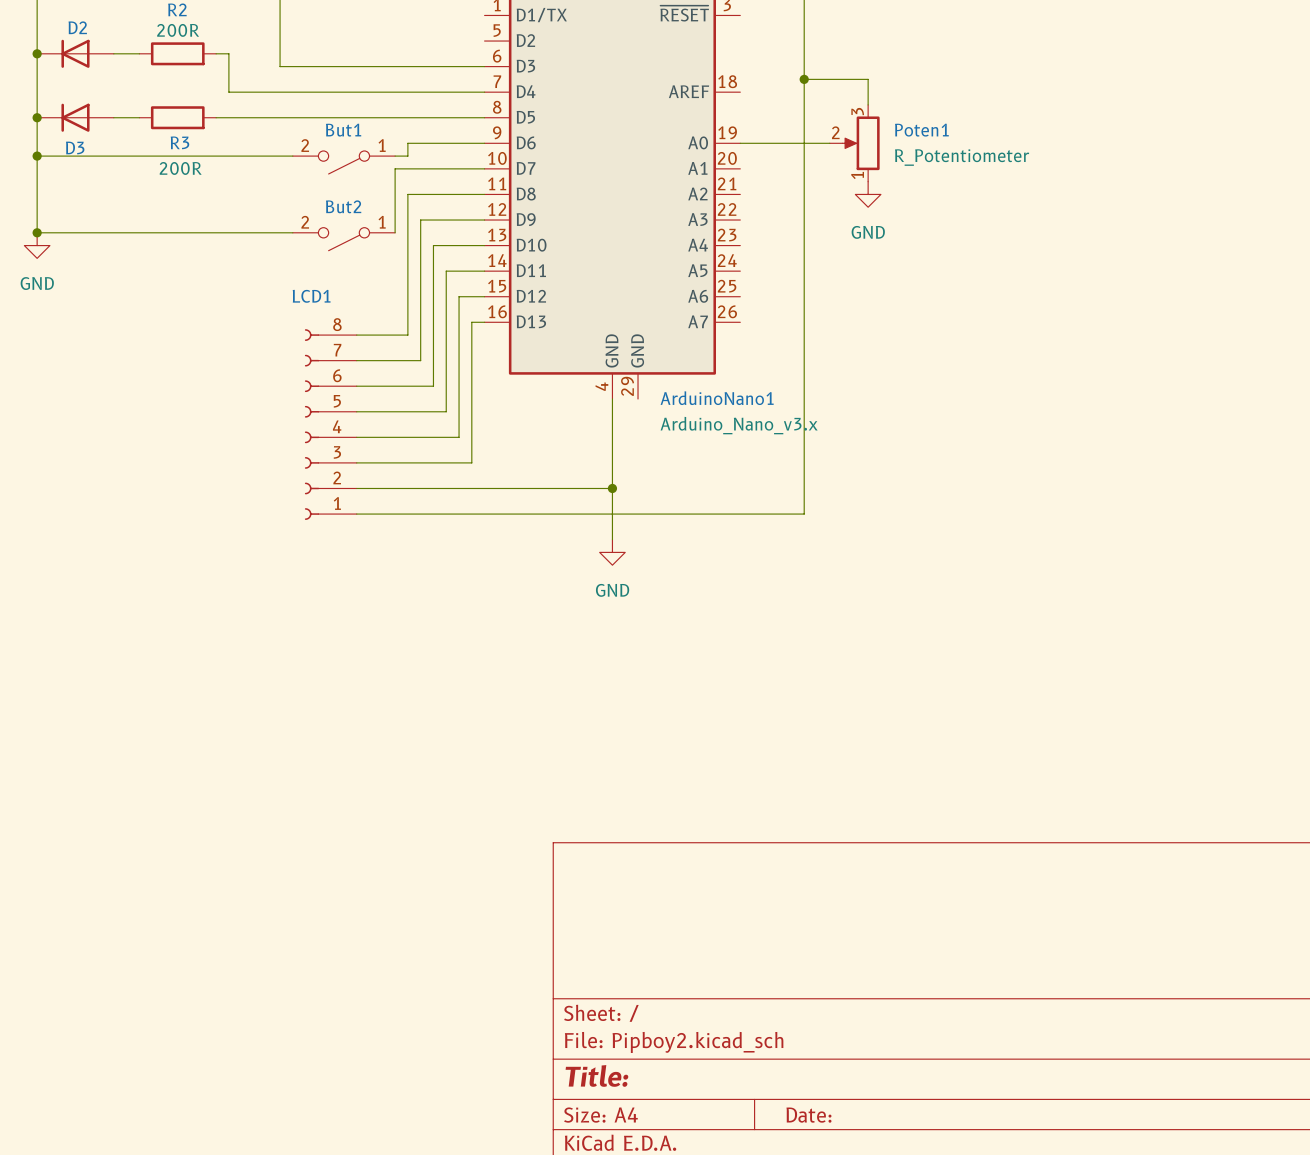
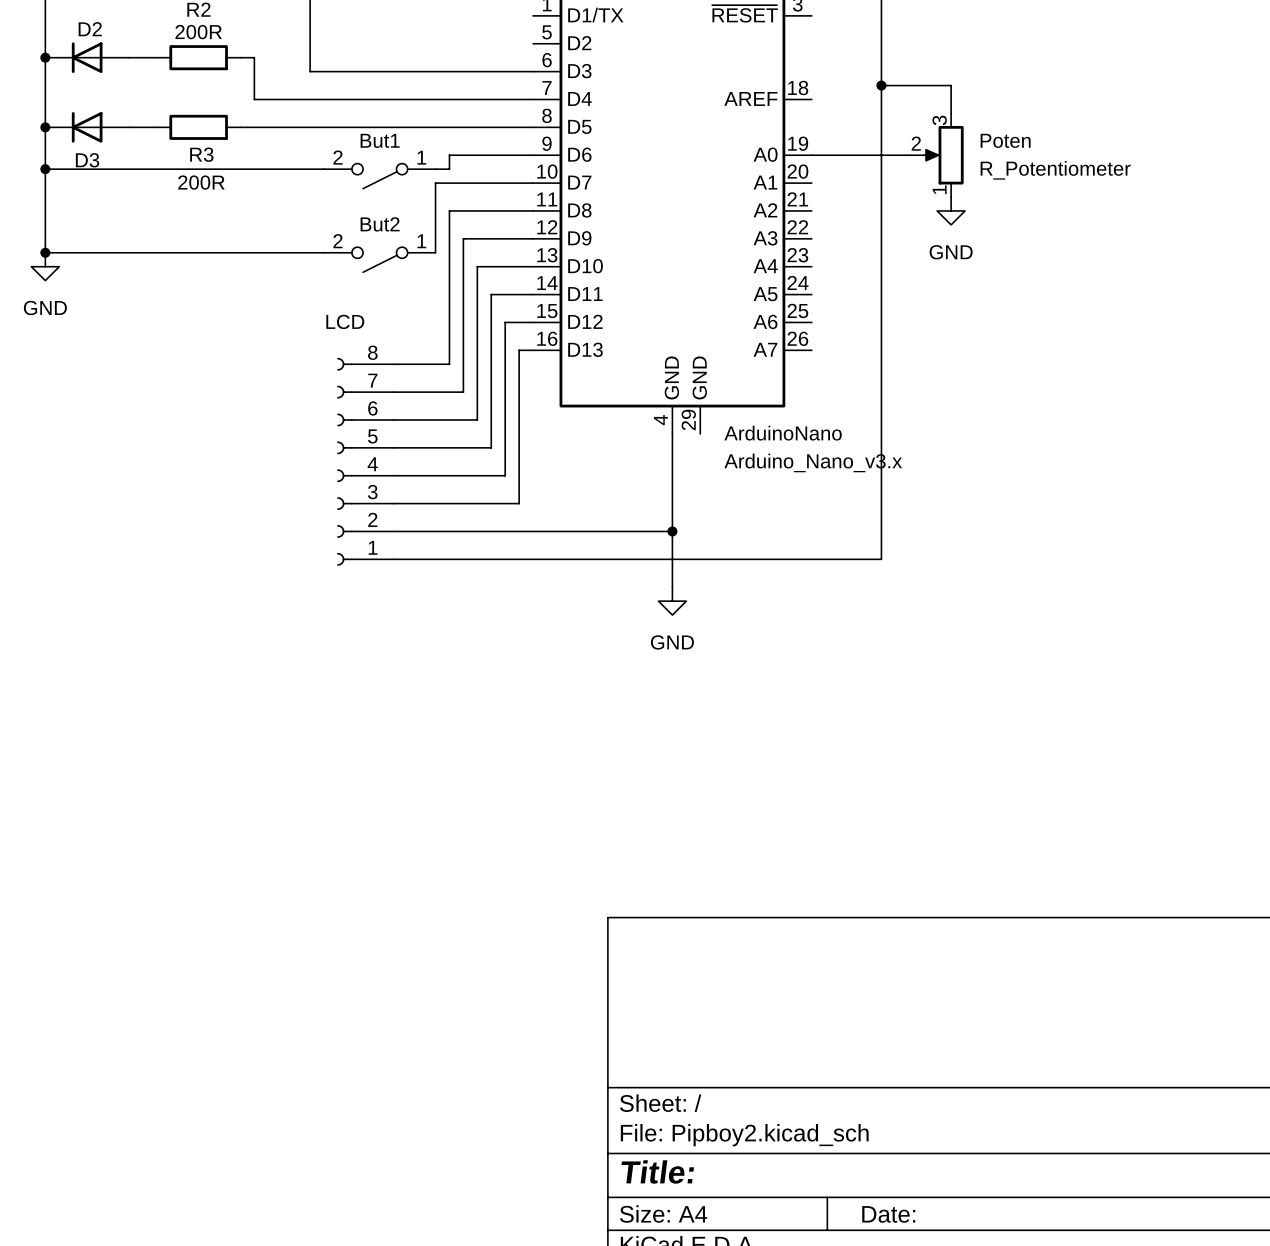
Poten1 name: Poten1 (921, 130) -> Poten (1005, 140)
LCD1 name: LCD1 (311, 296) -> LCD (345, 321)
ArduinoNano1 name: ArduinoNano1 (717, 398) -> ArduinoNano (783, 433)

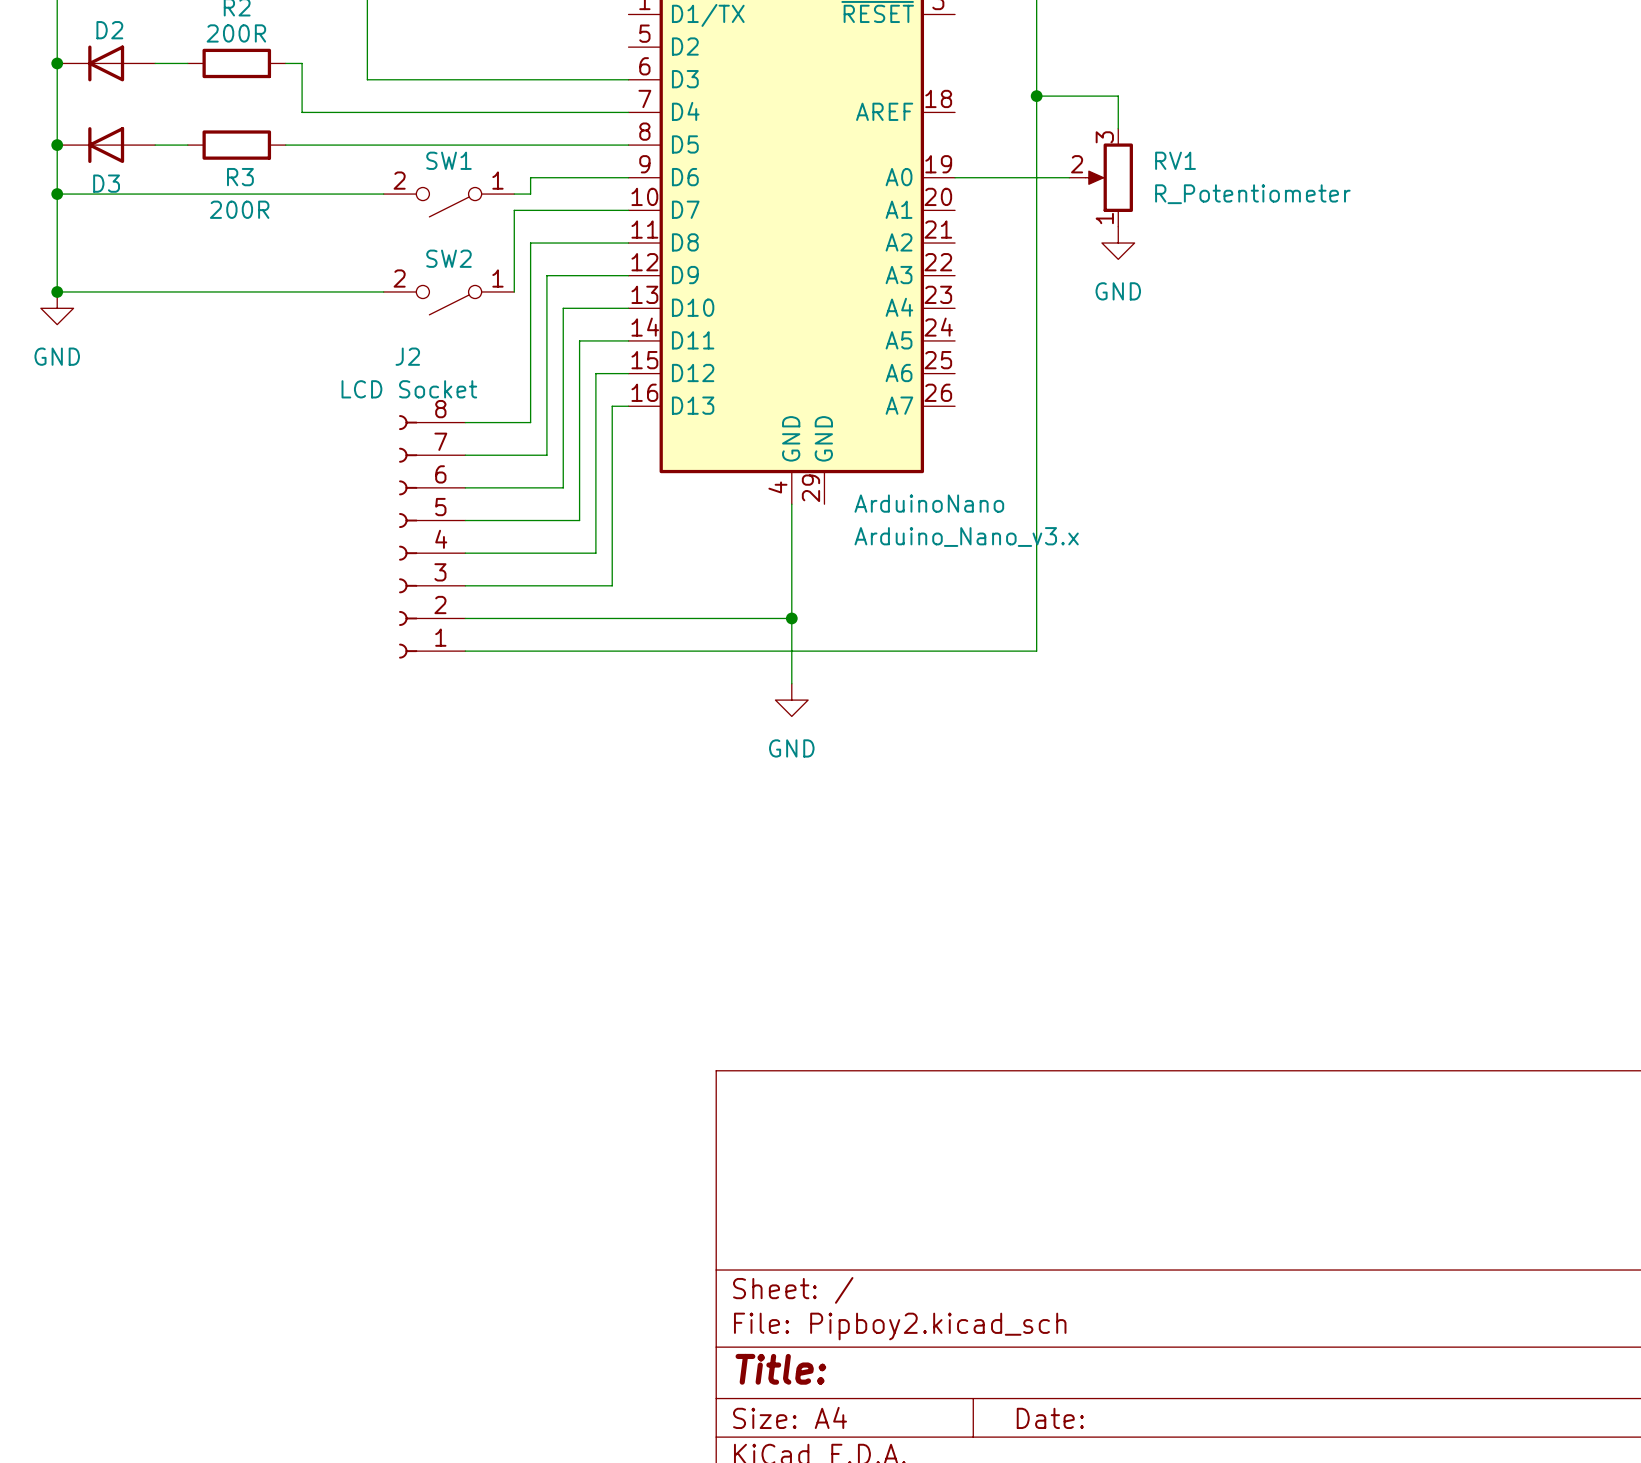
But1 name: But1 (380, 140) -> SW1 (448, 160)
Poten name: Poten (1005, 140) -> RV1 (1175, 160)
But2 name: But2 (380, 224) -> SW2 (448, 258)
LCD name: LCD (345, 321) -> J2 (407, 356)
LCD value: none -> LCD Socket (409, 389)

